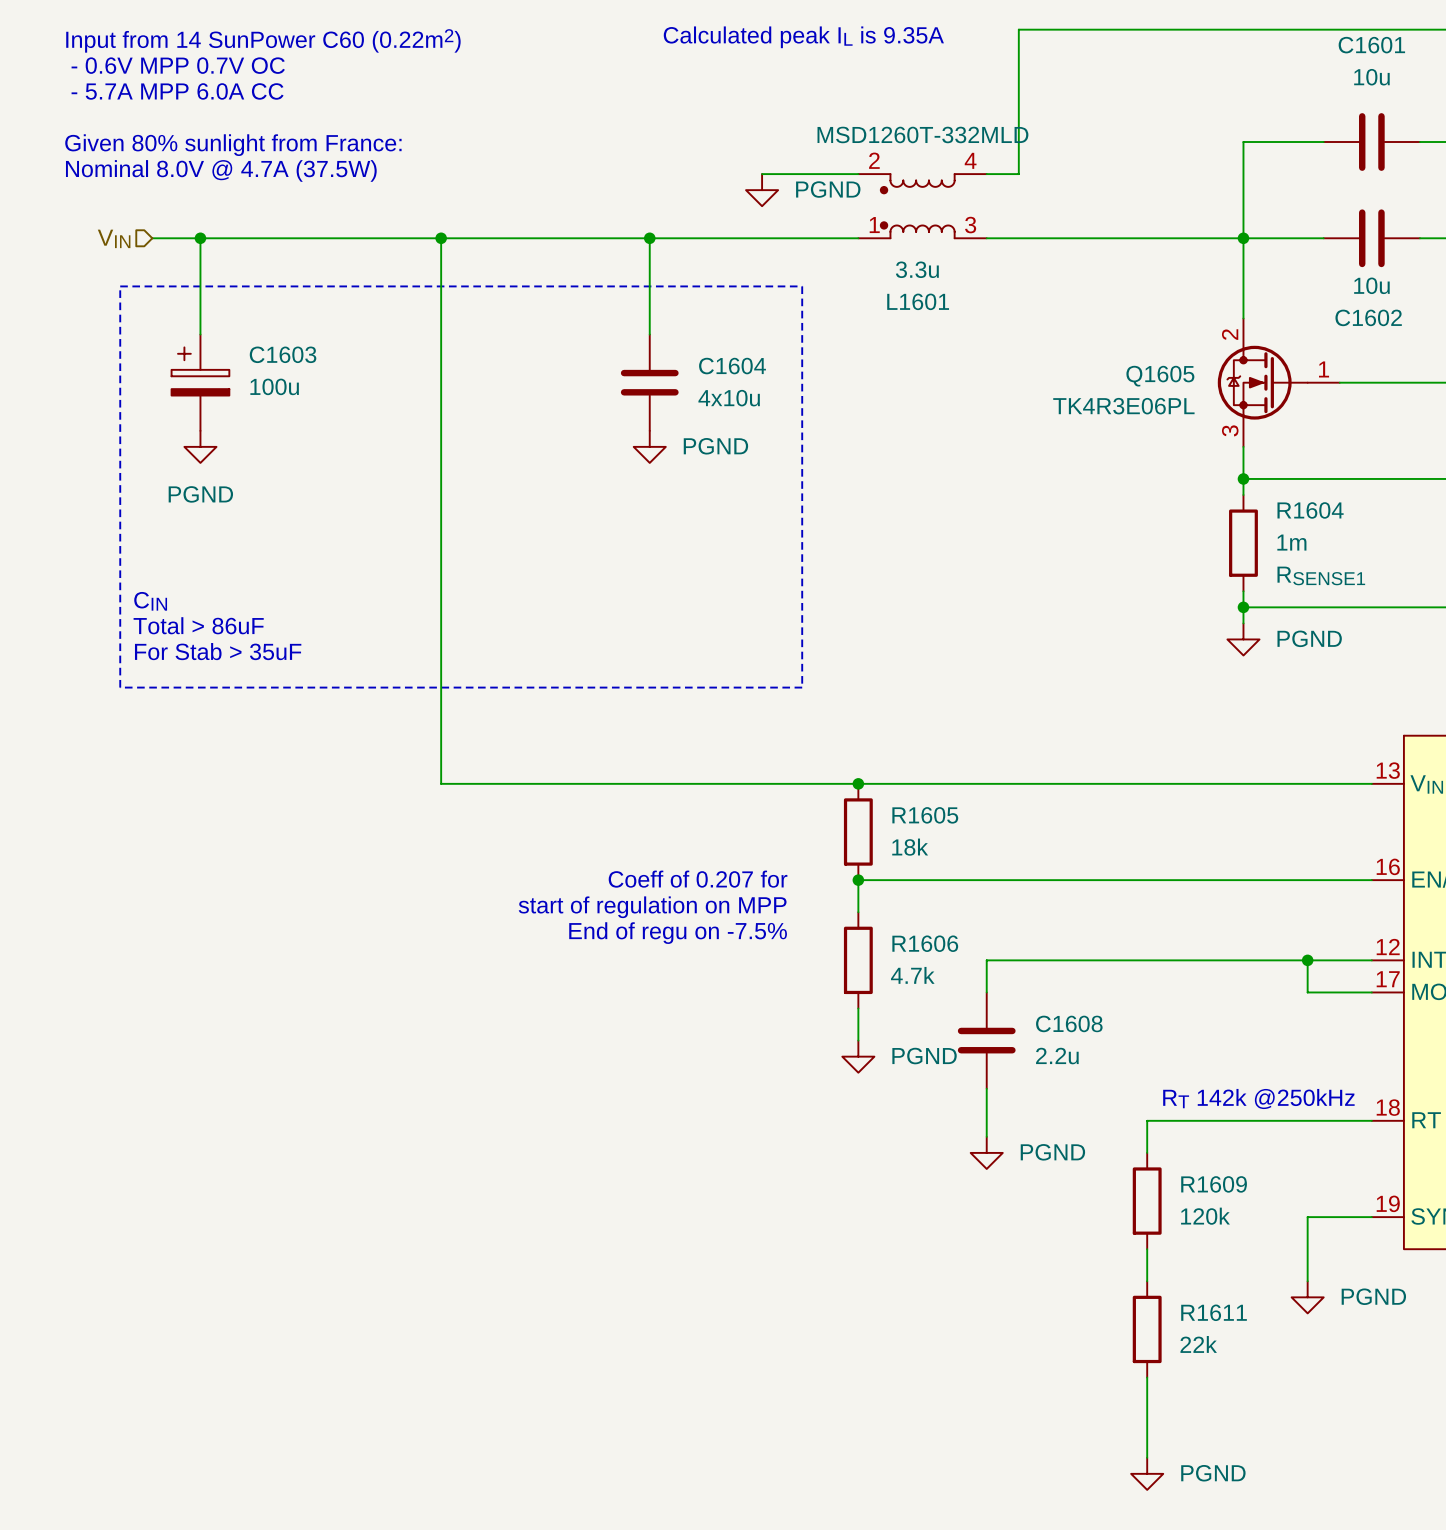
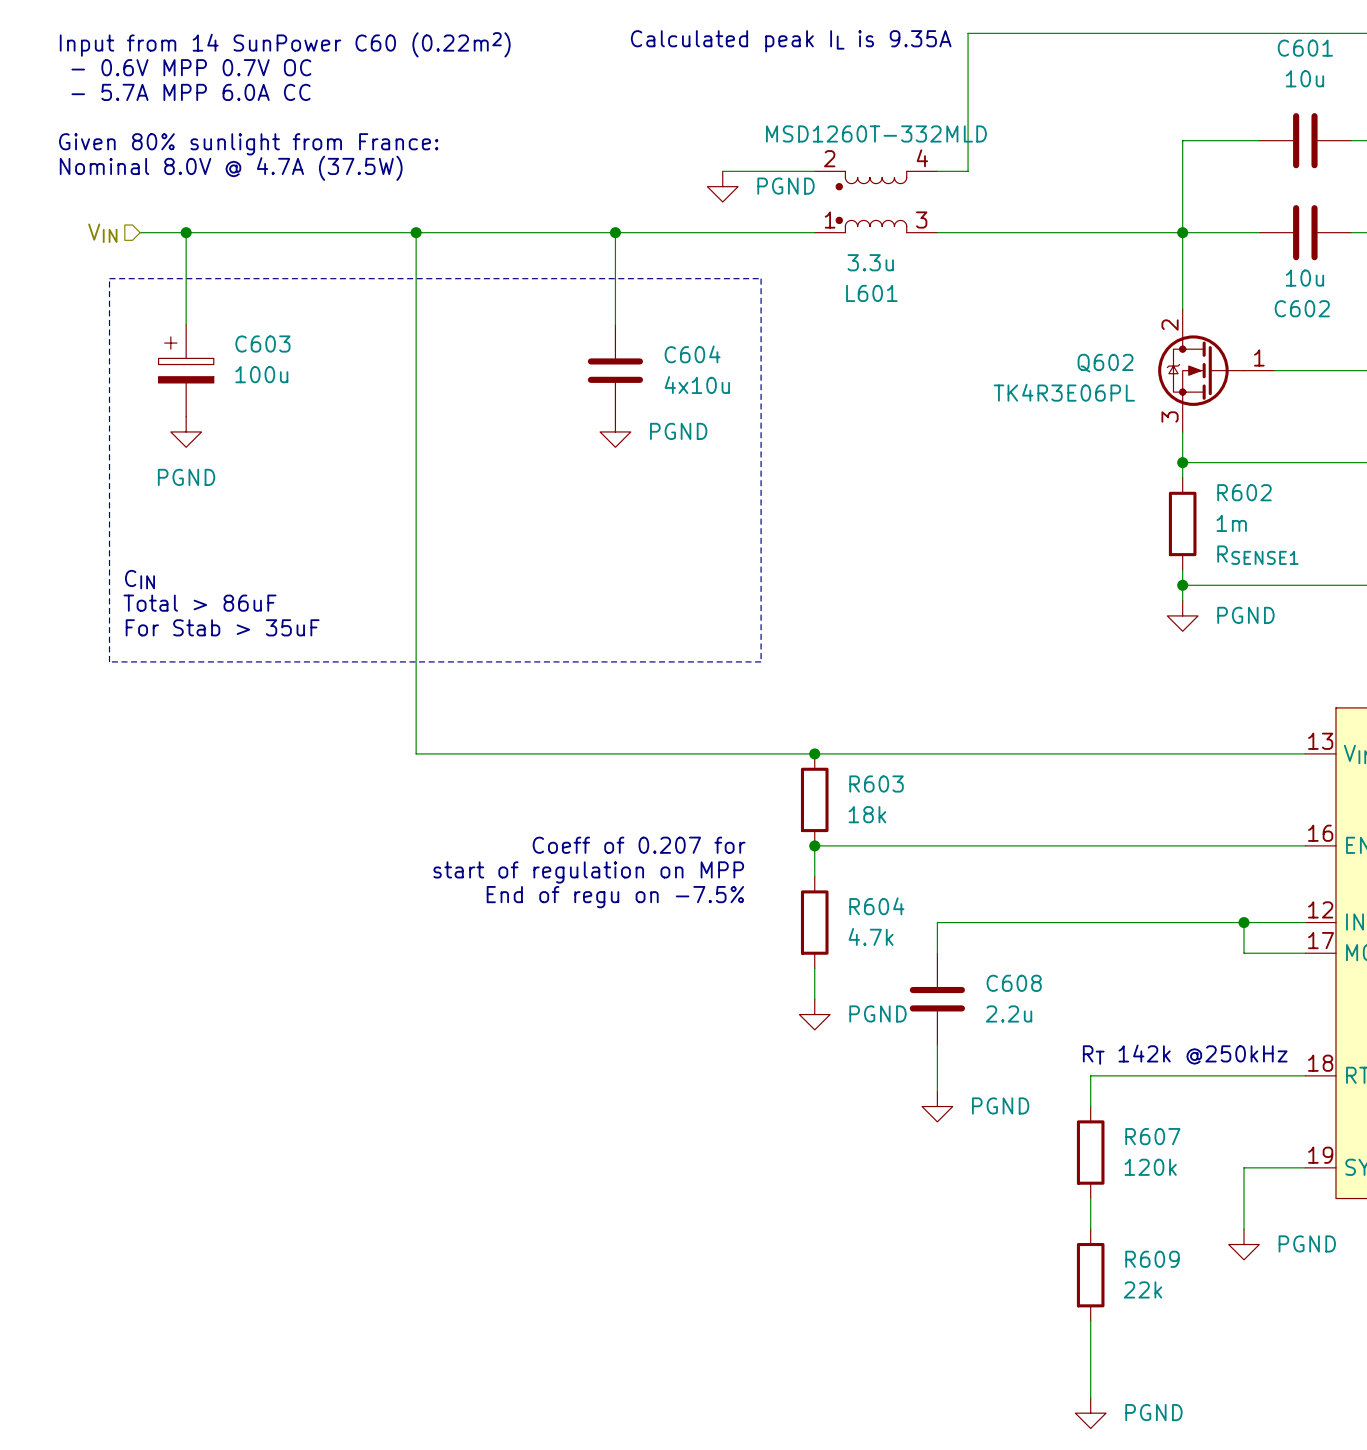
C1601 name: C1601 (1371, 45) -> C601 (1305, 48)
L1601 name: L1601 (918, 301) -> L601 (871, 293)
C1602 name: C1602 (1368, 317) -> C602 (1302, 308)
C1603 name: C1603 (283, 354) -> C603 (262, 344)
C1604 name: C1604 (732, 366) -> C604 (692, 354)
Q1605 name: Q1605 (1160, 376) -> Q602 (1105, 363)
R1604 name: R1604 (1310, 510) -> R602 (1244, 492)
R1605 name: R1605 (925, 815) -> R603 (876, 784)
R1606 name: R1606 (925, 943) -> R604 (876, 906)
C1608 name: C1608 (1069, 1023) -> C608 (1014, 983)
R1609 name: R1609 (1214, 1184) -> R607 (1152, 1136)
R1611 name: R1611 (1214, 1312) -> R609 (1152, 1259)

